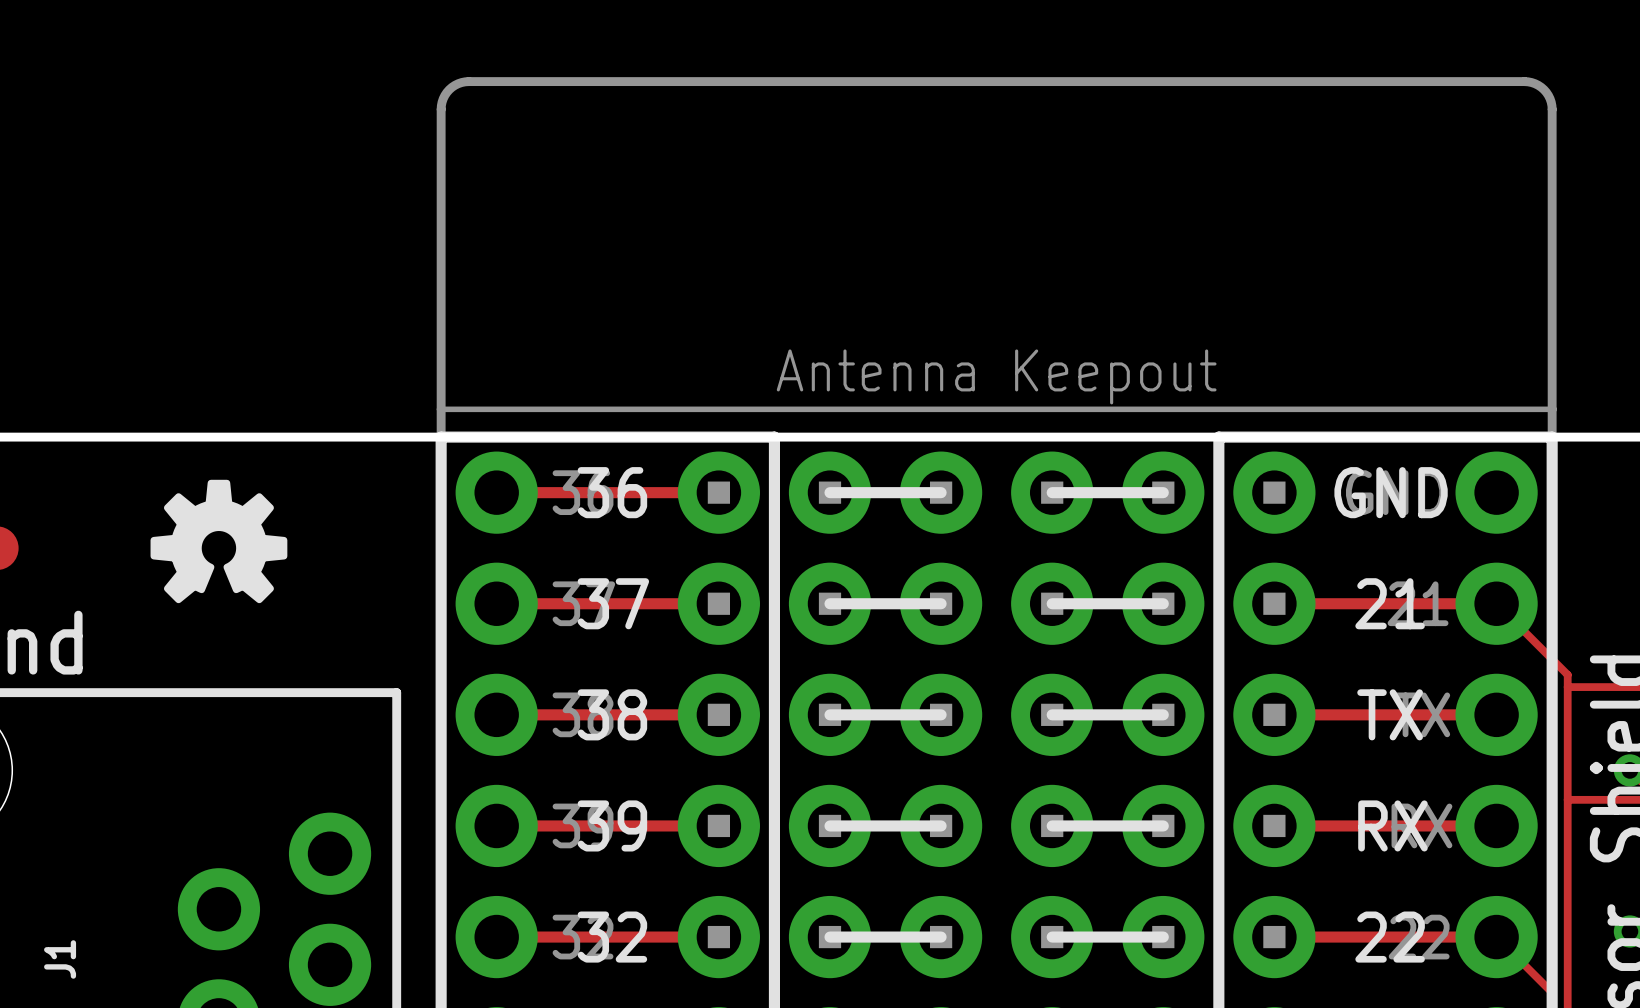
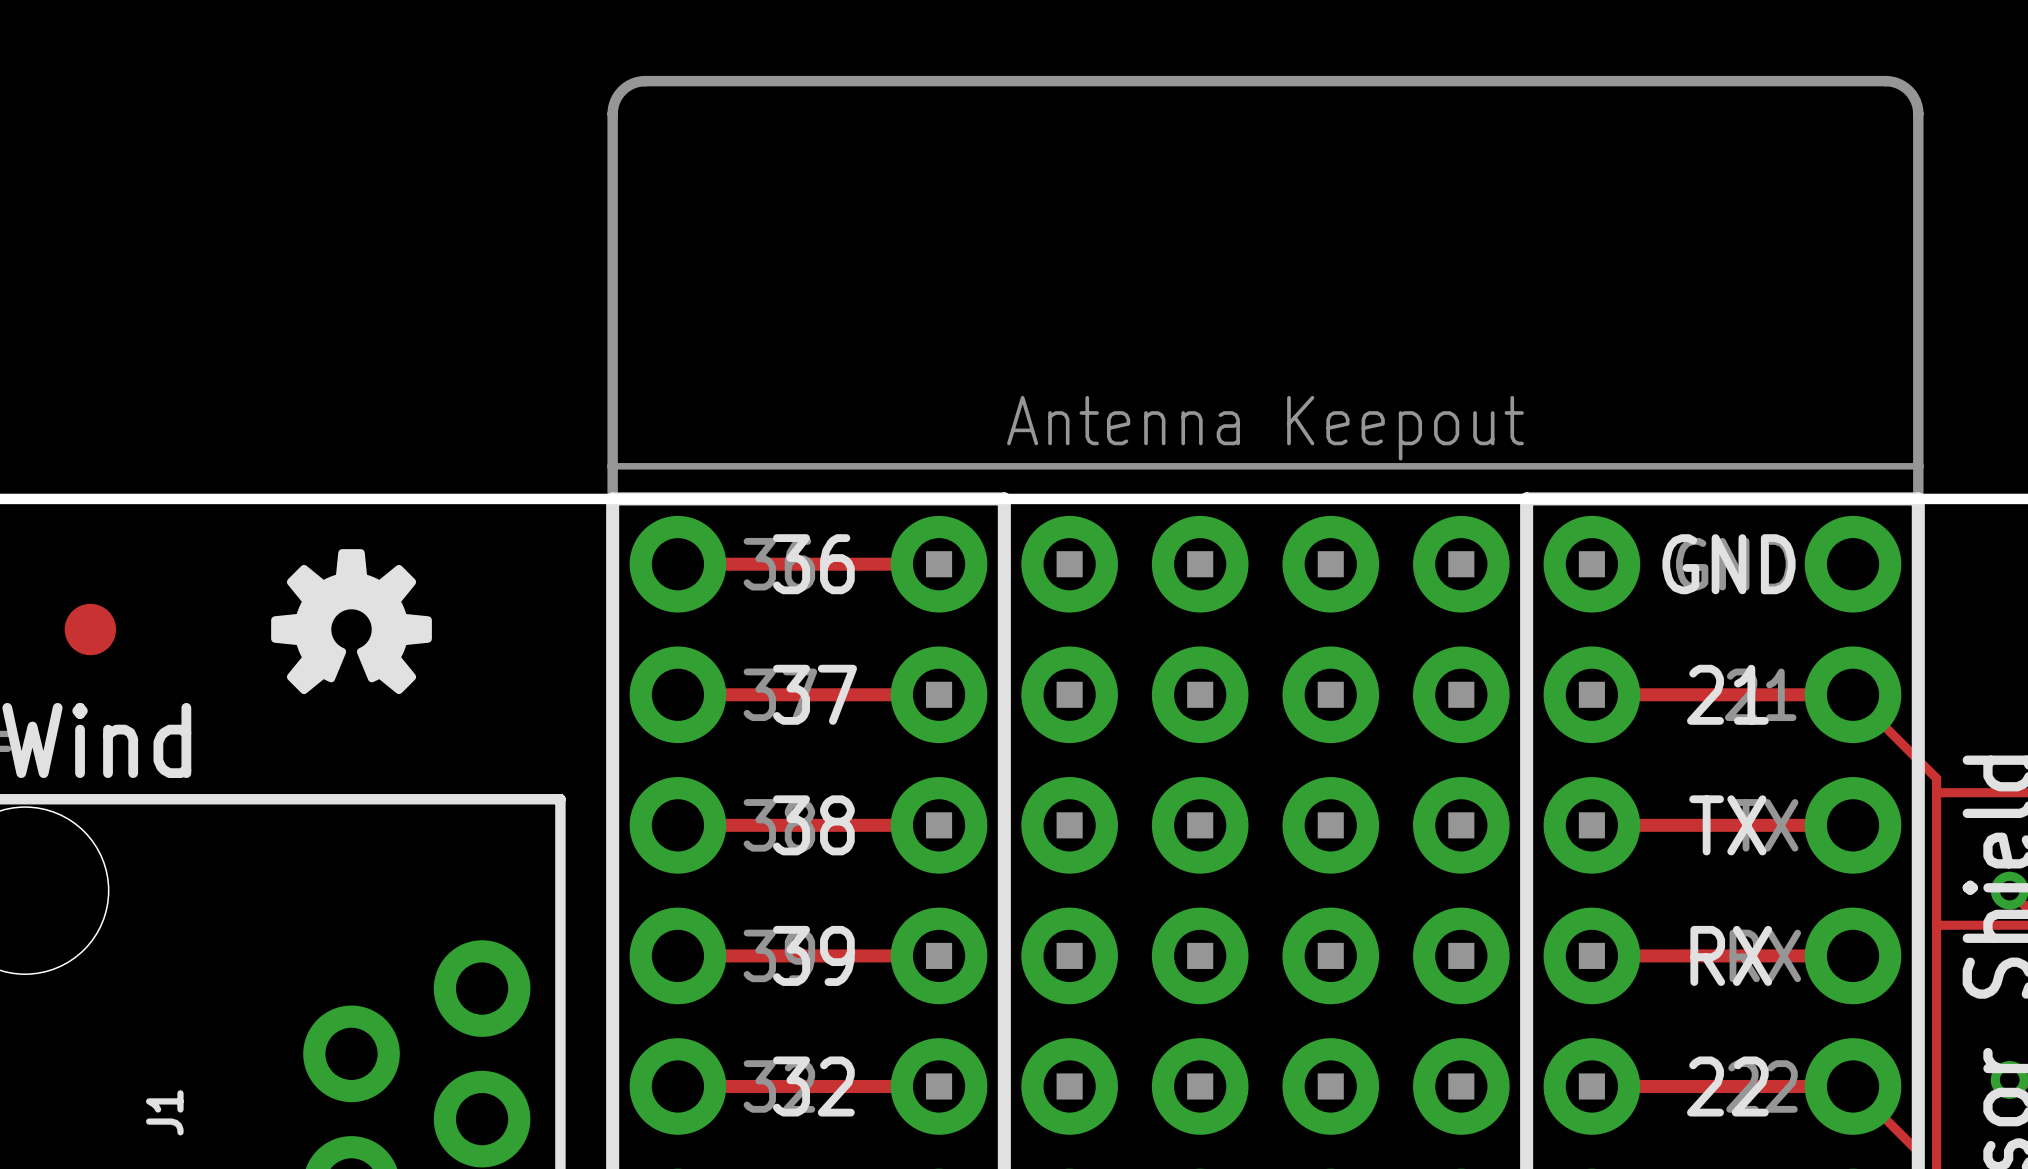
line: (830, 492) (941, 492) -> none
line: (1052, 492) (1163, 492) -> none
line: (830, 603) (941, 603) -> none
line: (1052, 603) (1163, 603) -> none
line: (830, 714) (941, 714) -> none
line: (1052, 714) (1163, 714) -> none
line: (830, 825) (941, 825) -> none
line: (1052, 825) (1163, 825) -> none
line: (830, 937) (941, 937) -> none
line: (1052, 937) (1163, 937) -> none

